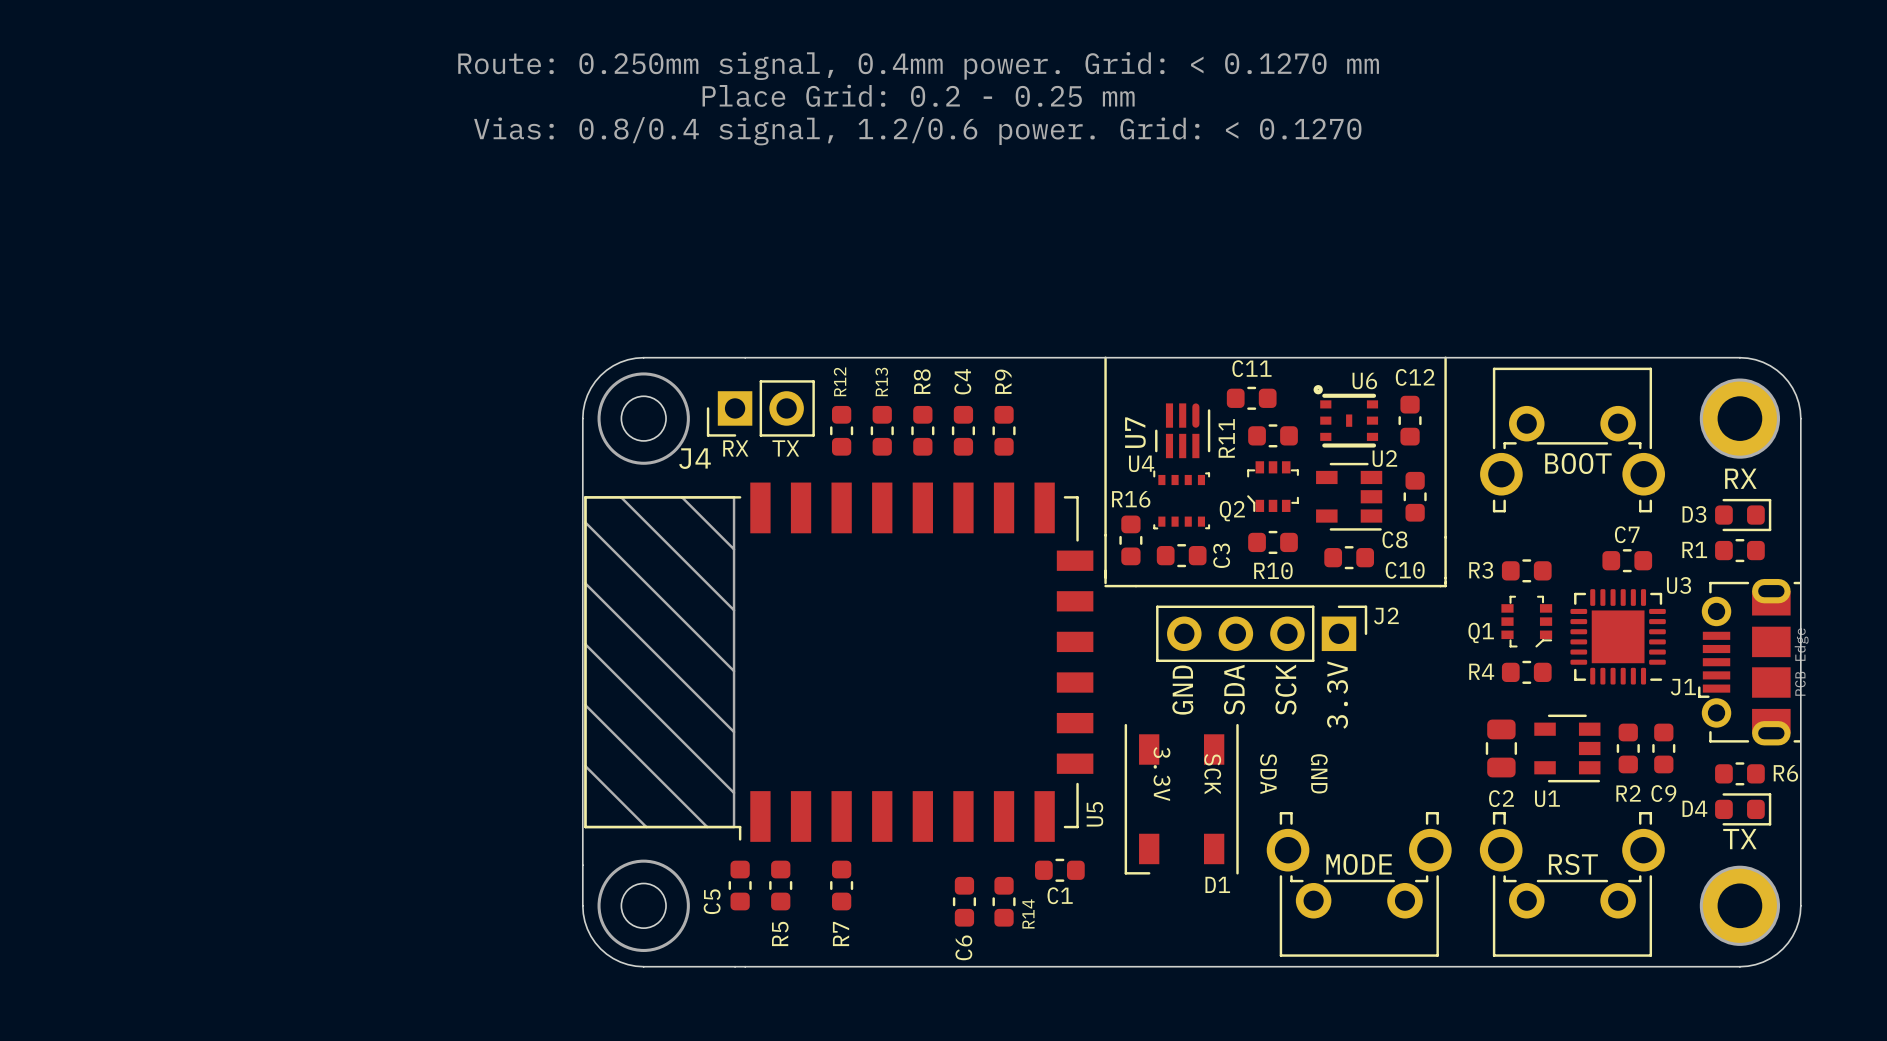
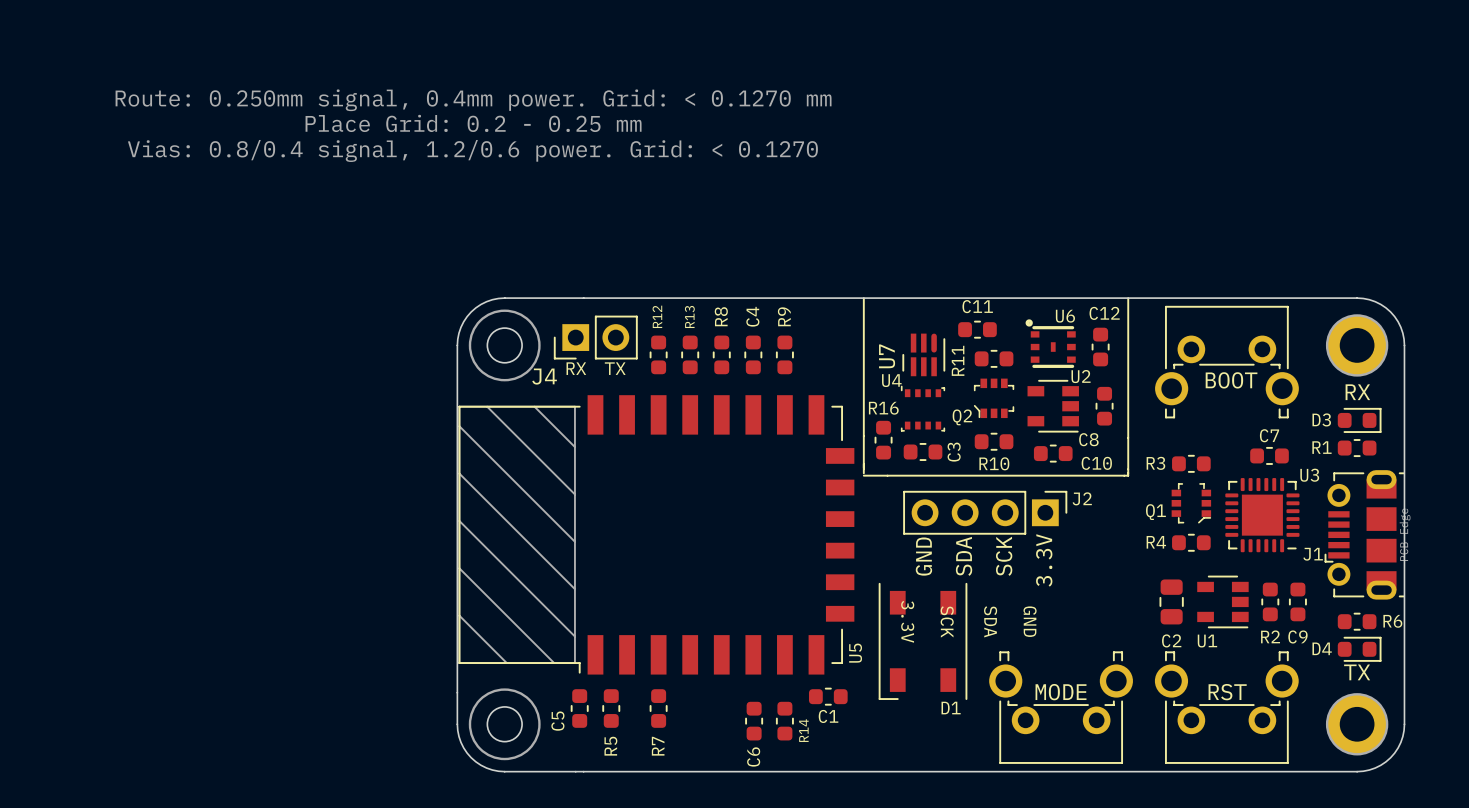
text position: Route: 0.250mm signal, 0.4mm power. Grid: < 0.1270 mm (918, 66) -> Route: 0.250mm signal, 0.4mm power. Grid: < 0.1270 mm (473, 100)
text position: Place Grid: 0.2 - 0.25 mm (918, 95) -> Place Grid: 0.2 - 0.25 mm (473, 123)
text position: Vias: 0.8/0.4 signal, 1.2/0.6 power. Grid: < 0.1270 (917, 131) -> Vias: 0.8/0.4 signal, 1.2/0.6 power. Grid: < 0.1270 (472, 150)

